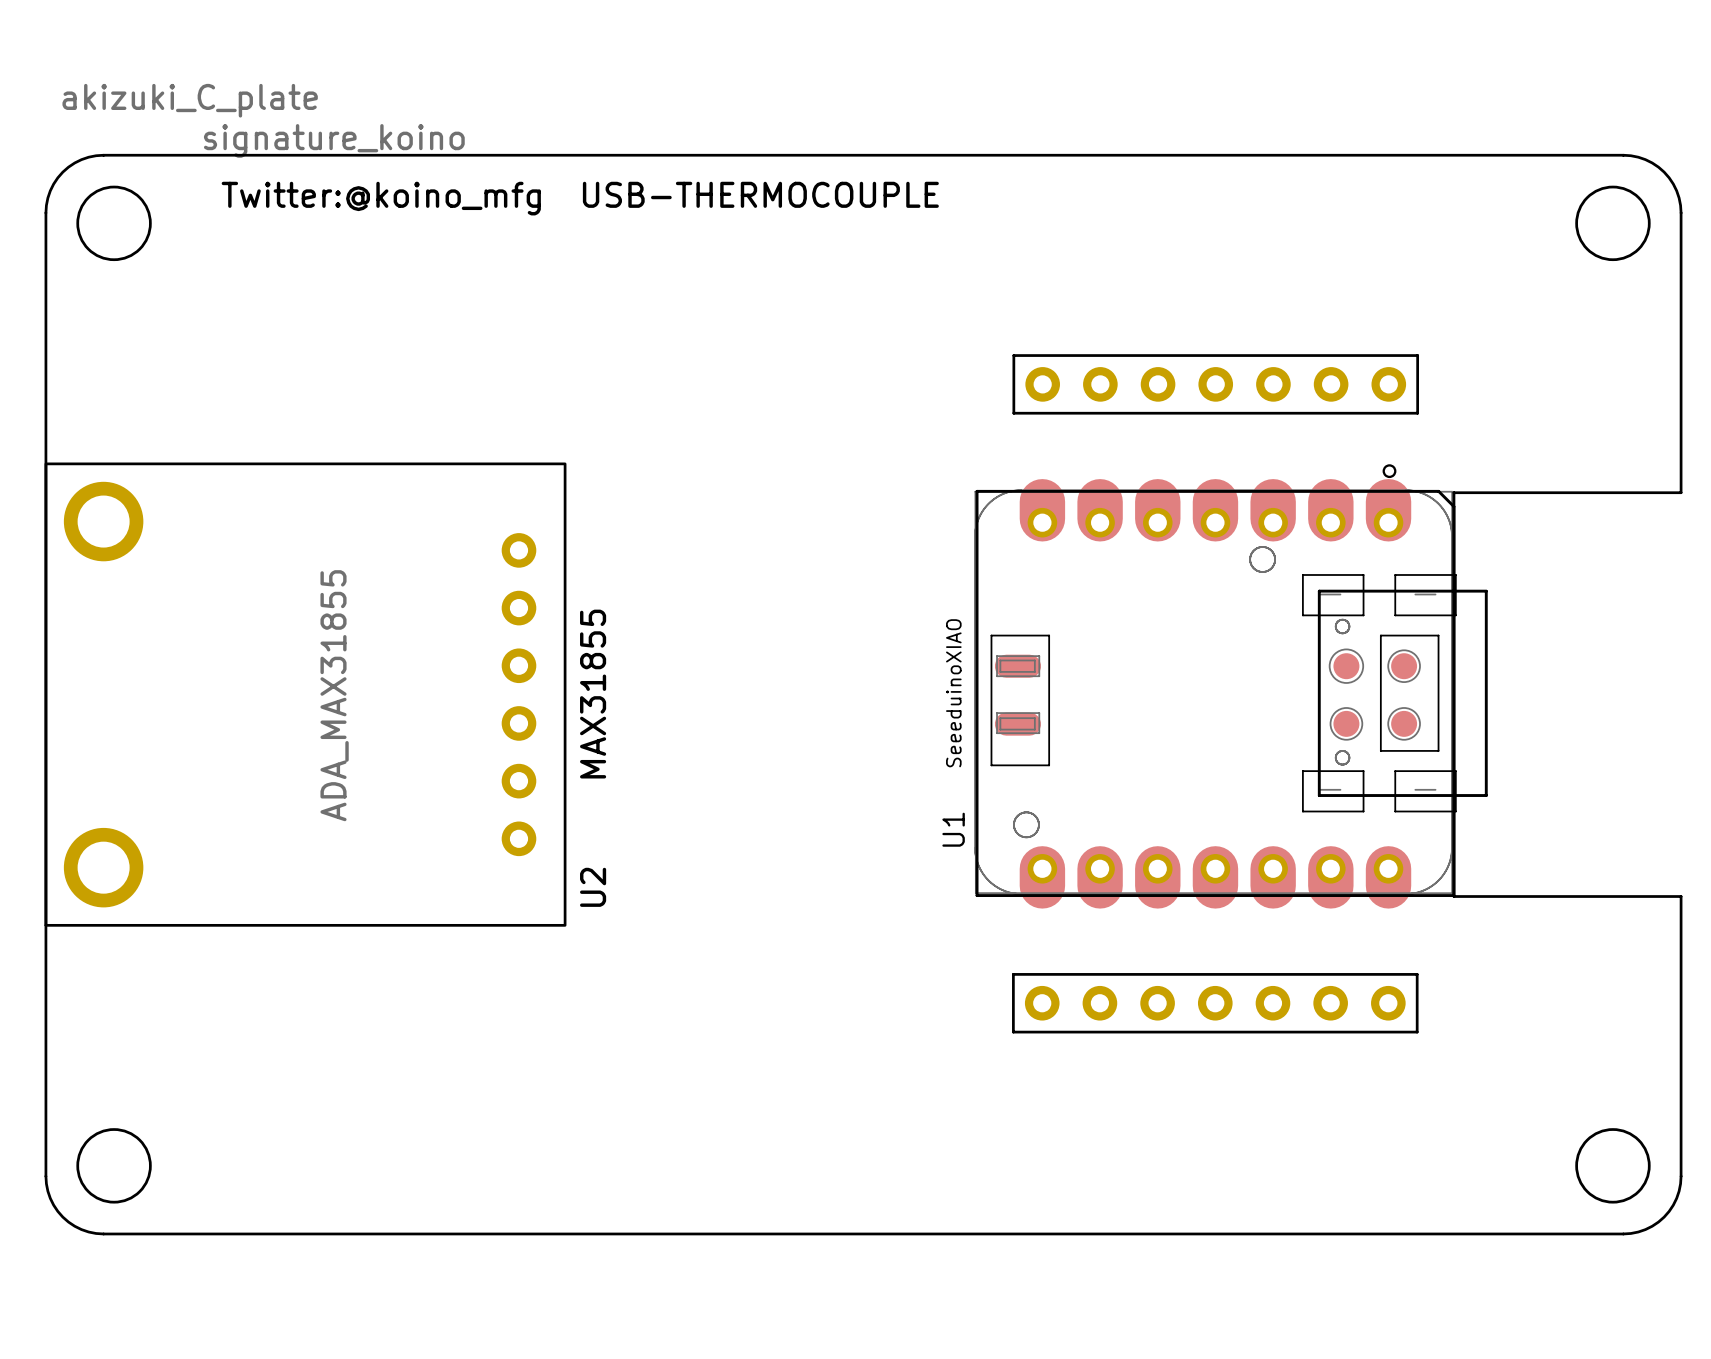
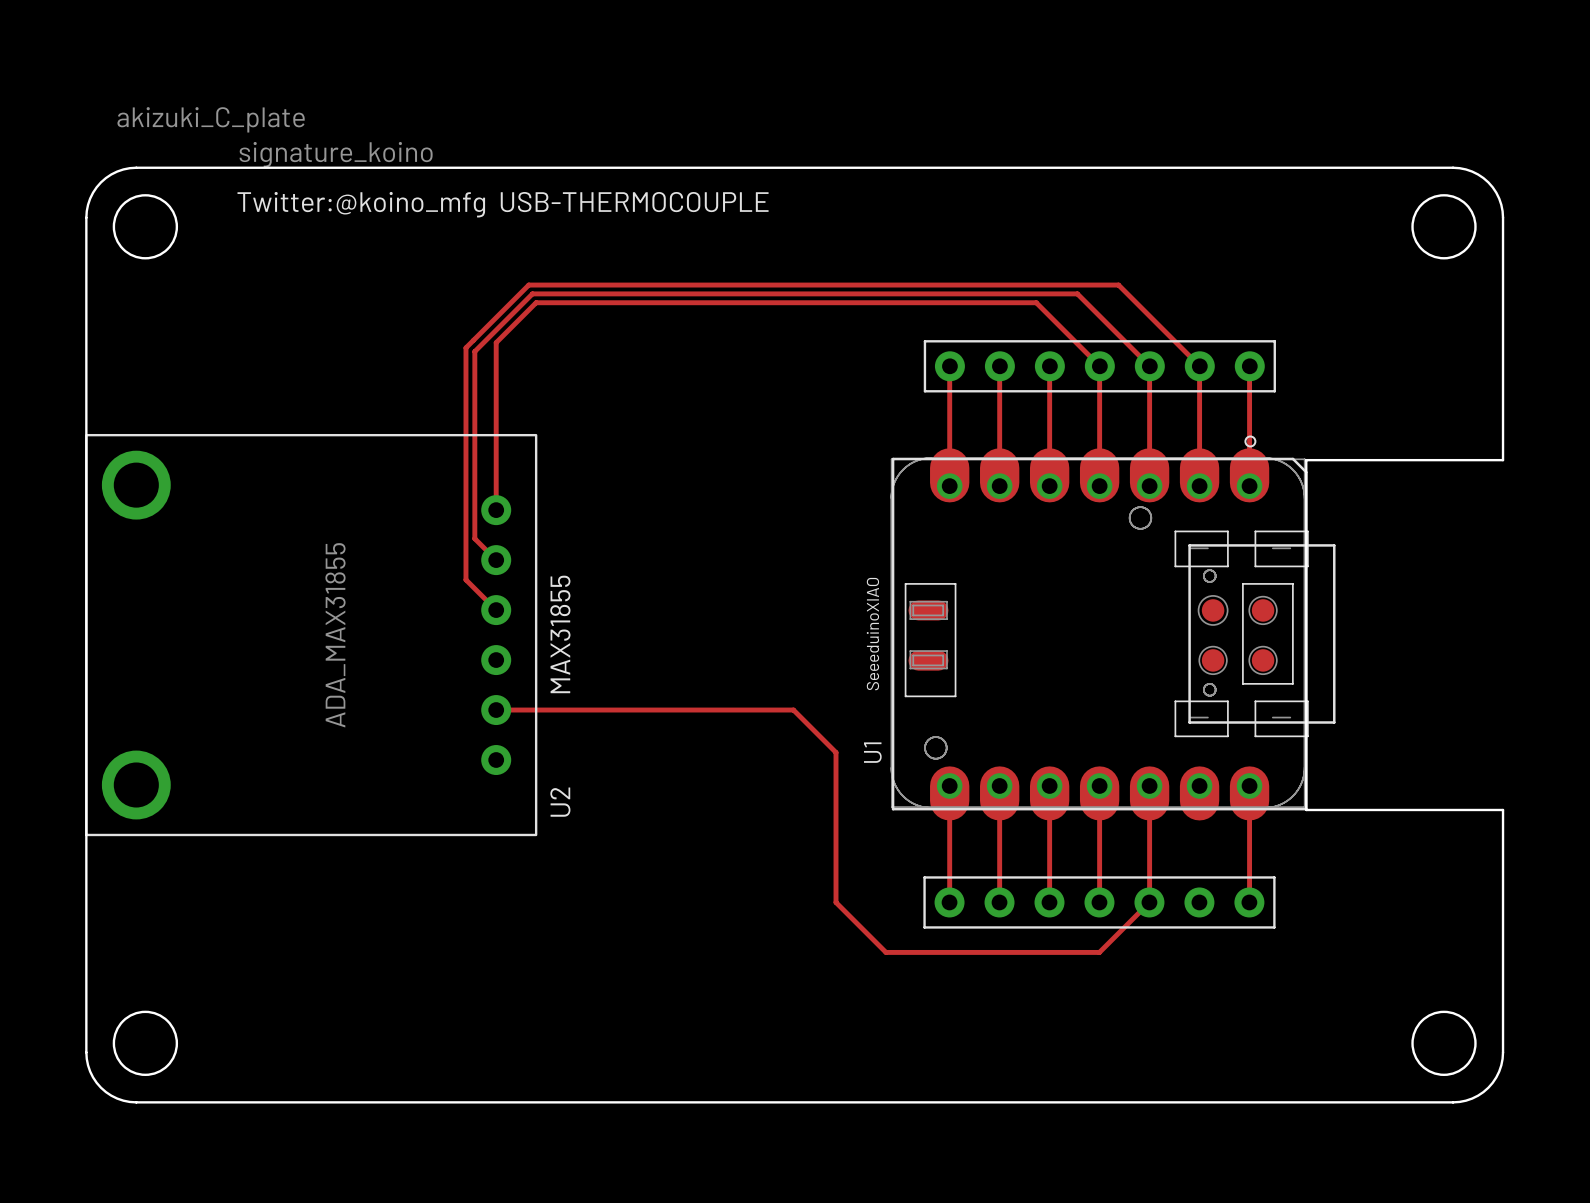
top track: none -> (949, 366) (949, 486)
top track: none -> (999, 366) (999, 486)
top track: none -> (1049, 366) (1049, 486)
top track: none -> (1099, 366) (1036, 302) (536, 302) (496, 342) (496, 510)
top track: none -> (1099, 366) (1099, 486)
top track: none -> (1149, 366) (1077, 293) (532, 293) (474, 351) (474, 538) (496, 560)
top track: none -> (1149, 366) (1149, 486)
top track: none -> (1199, 366) (1199, 486)
top track: none -> (1199, 366) (1118, 285) (528, 285) (465, 347) (465, 579) (496, 610)
top track: none -> (1249, 366) (1249, 486)
top track: none -> (496, 710) (793, 710) (836, 752) (836, 902) (885, 952) (1099, 952) (1149, 902) (1149, 793)
top track: none -> (949, 785) (949, 902)
top track: none -> (999, 785) (999, 902)
top track: none -> (1049, 785) (1049, 902)
top track: none -> (1099, 785) (1099, 902)
top track: none -> (1249, 793) (1249, 902)

